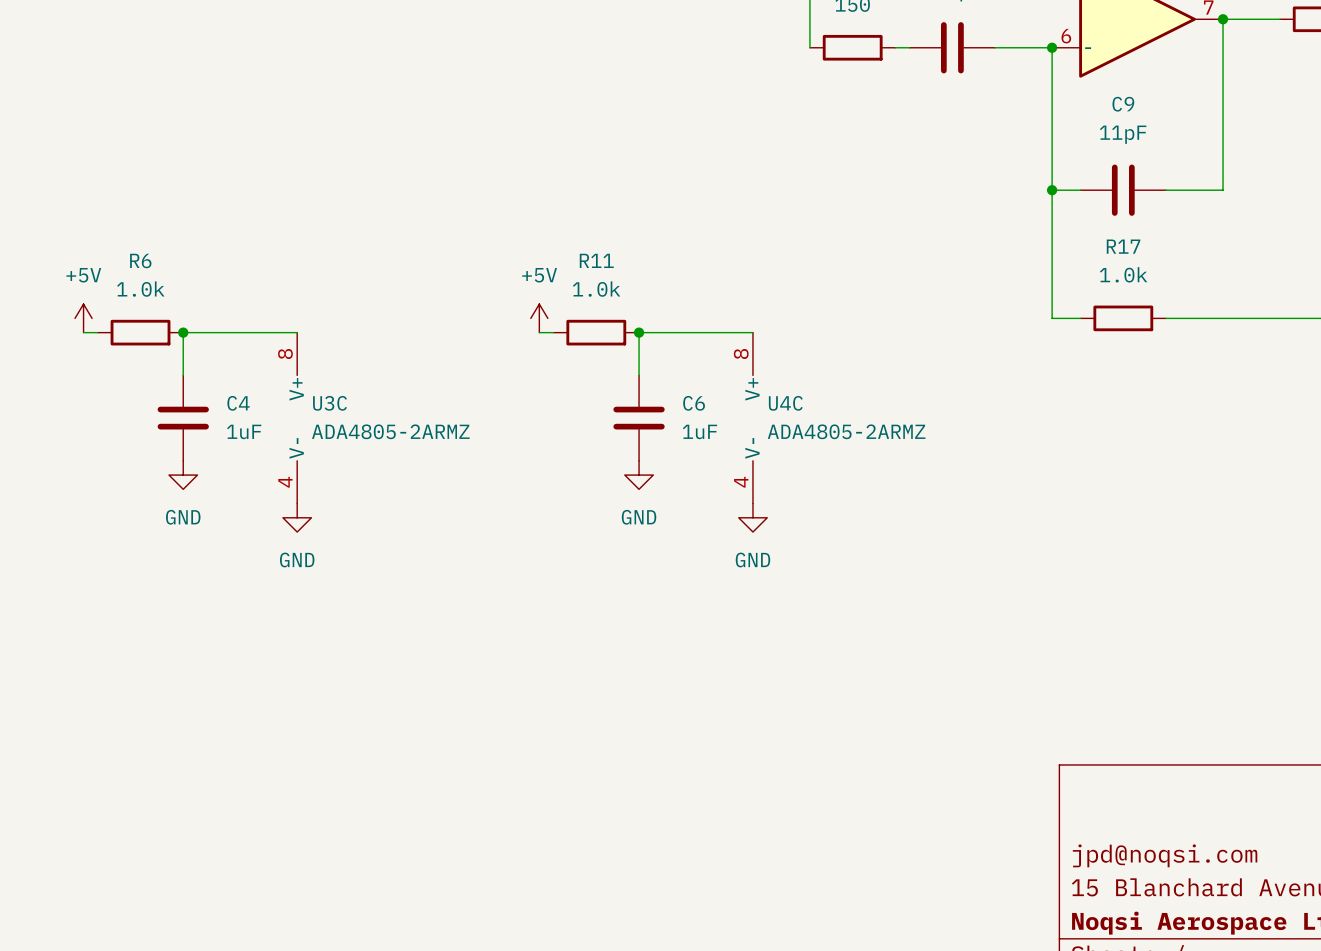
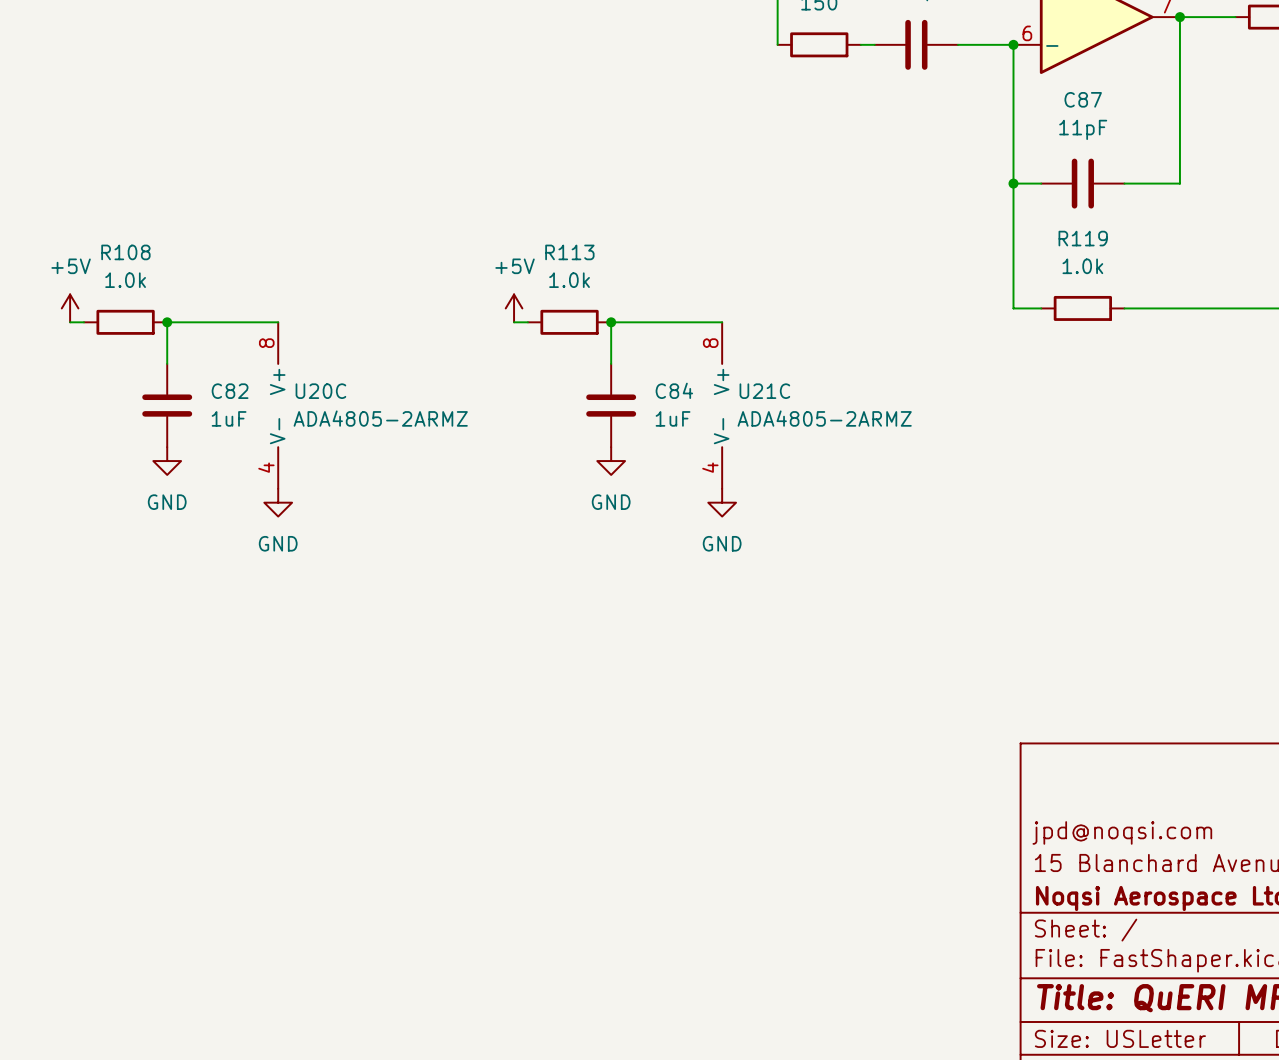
C9 name: C9 (1123, 104) -> C87 (1083, 99)
R17 name: R17 (1123, 246) -> R119 (1083, 238)
R11 name: R11 (596, 260) -> R113 (569, 252)
R6 name: R6 (140, 261) -> R108 (125, 252)
C4 name: C4 (238, 403) -> C82 (230, 391)
U3C name: U3C (329, 403) -> U20C (320, 391)
C6 name: C6 (694, 403) -> C84 (674, 390)
U4C name: U4C (785, 403) -> U21C (764, 391)

